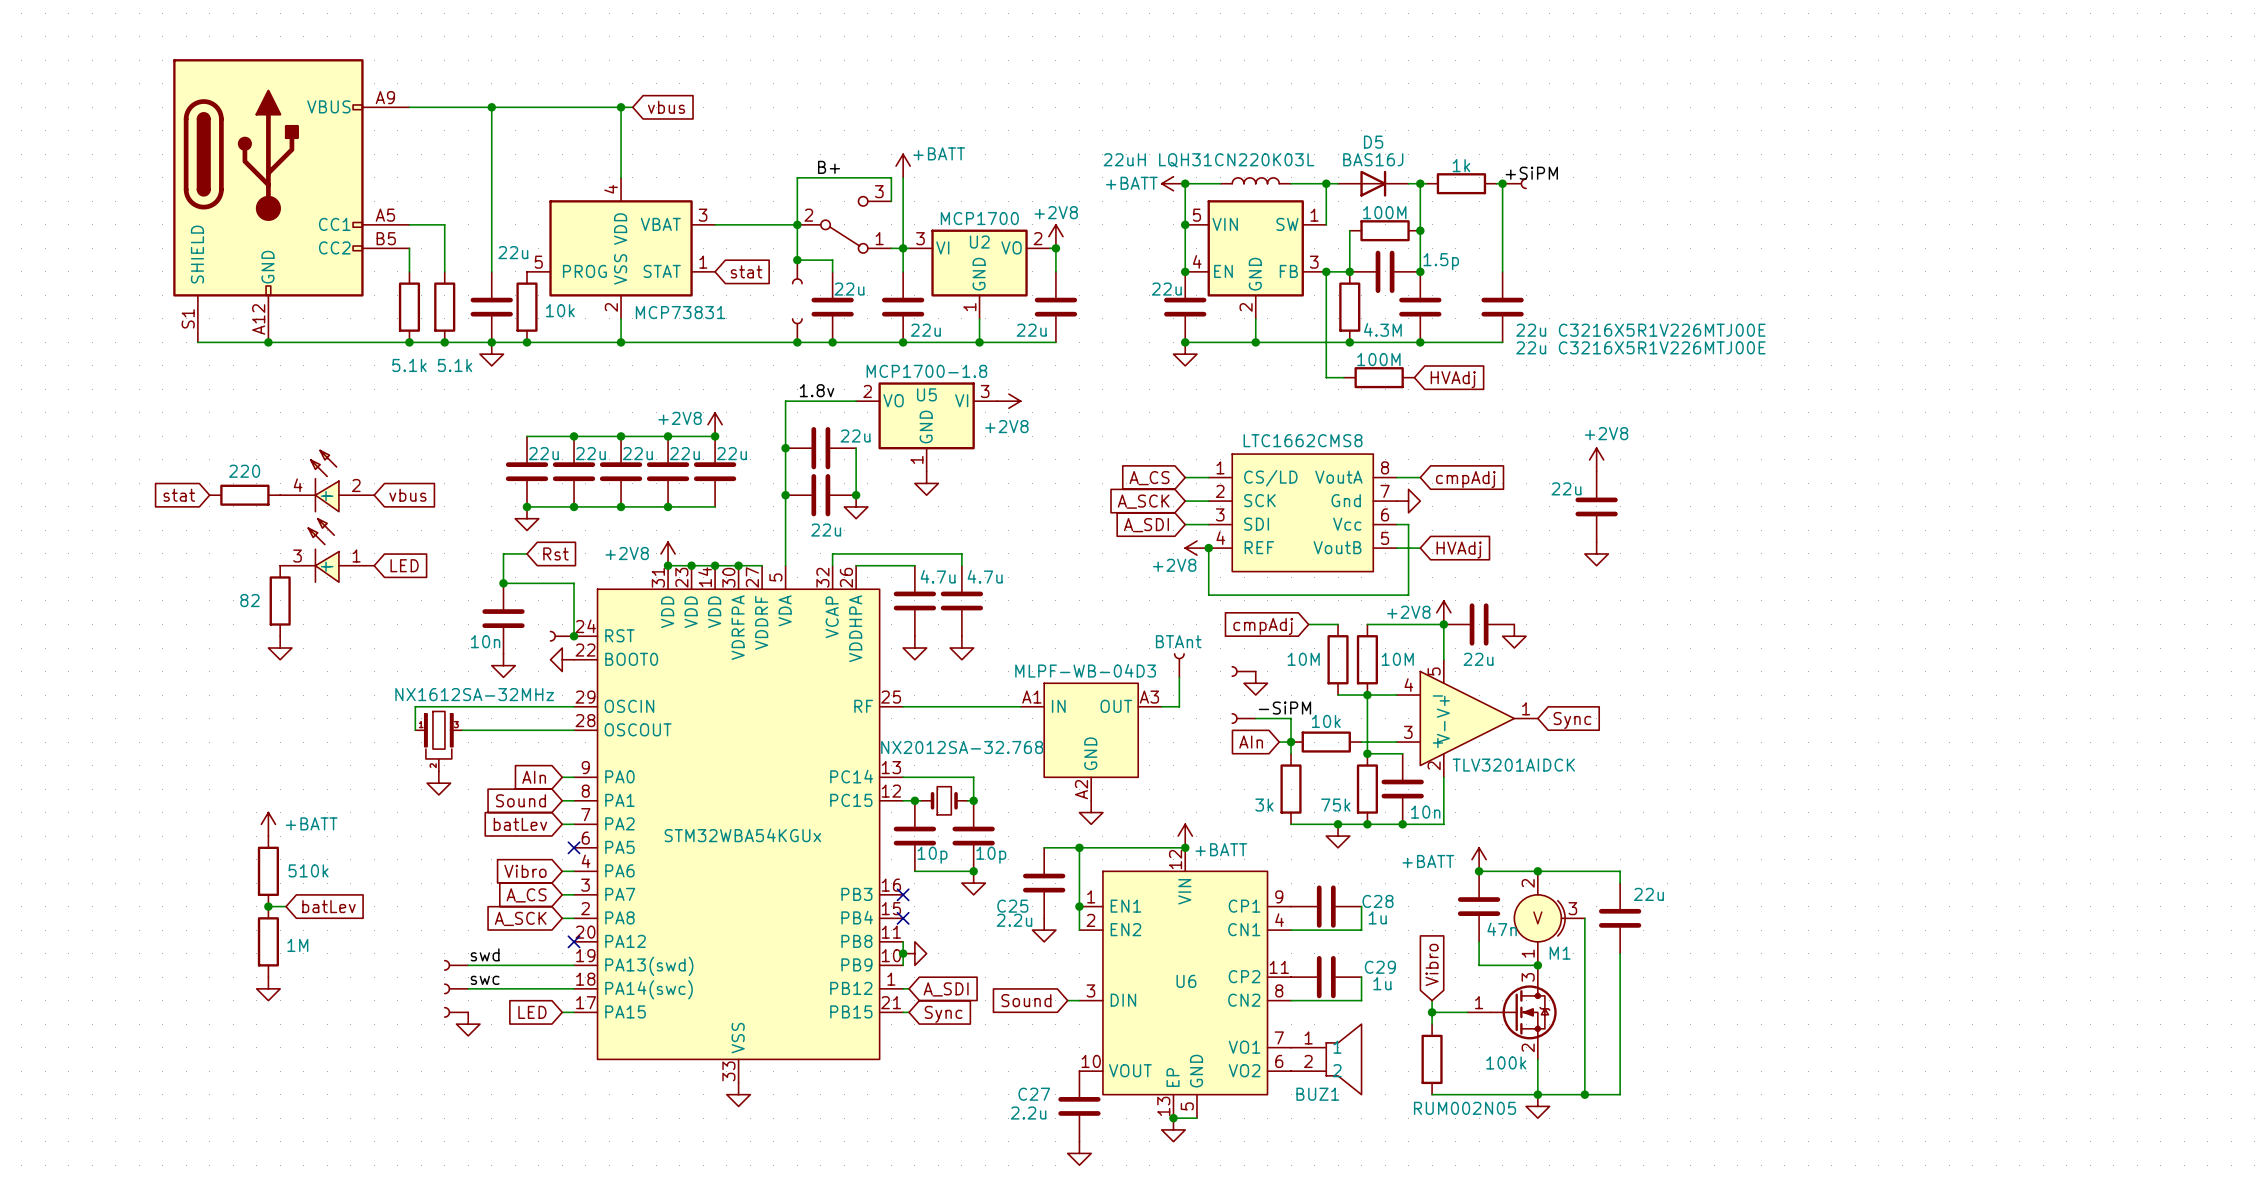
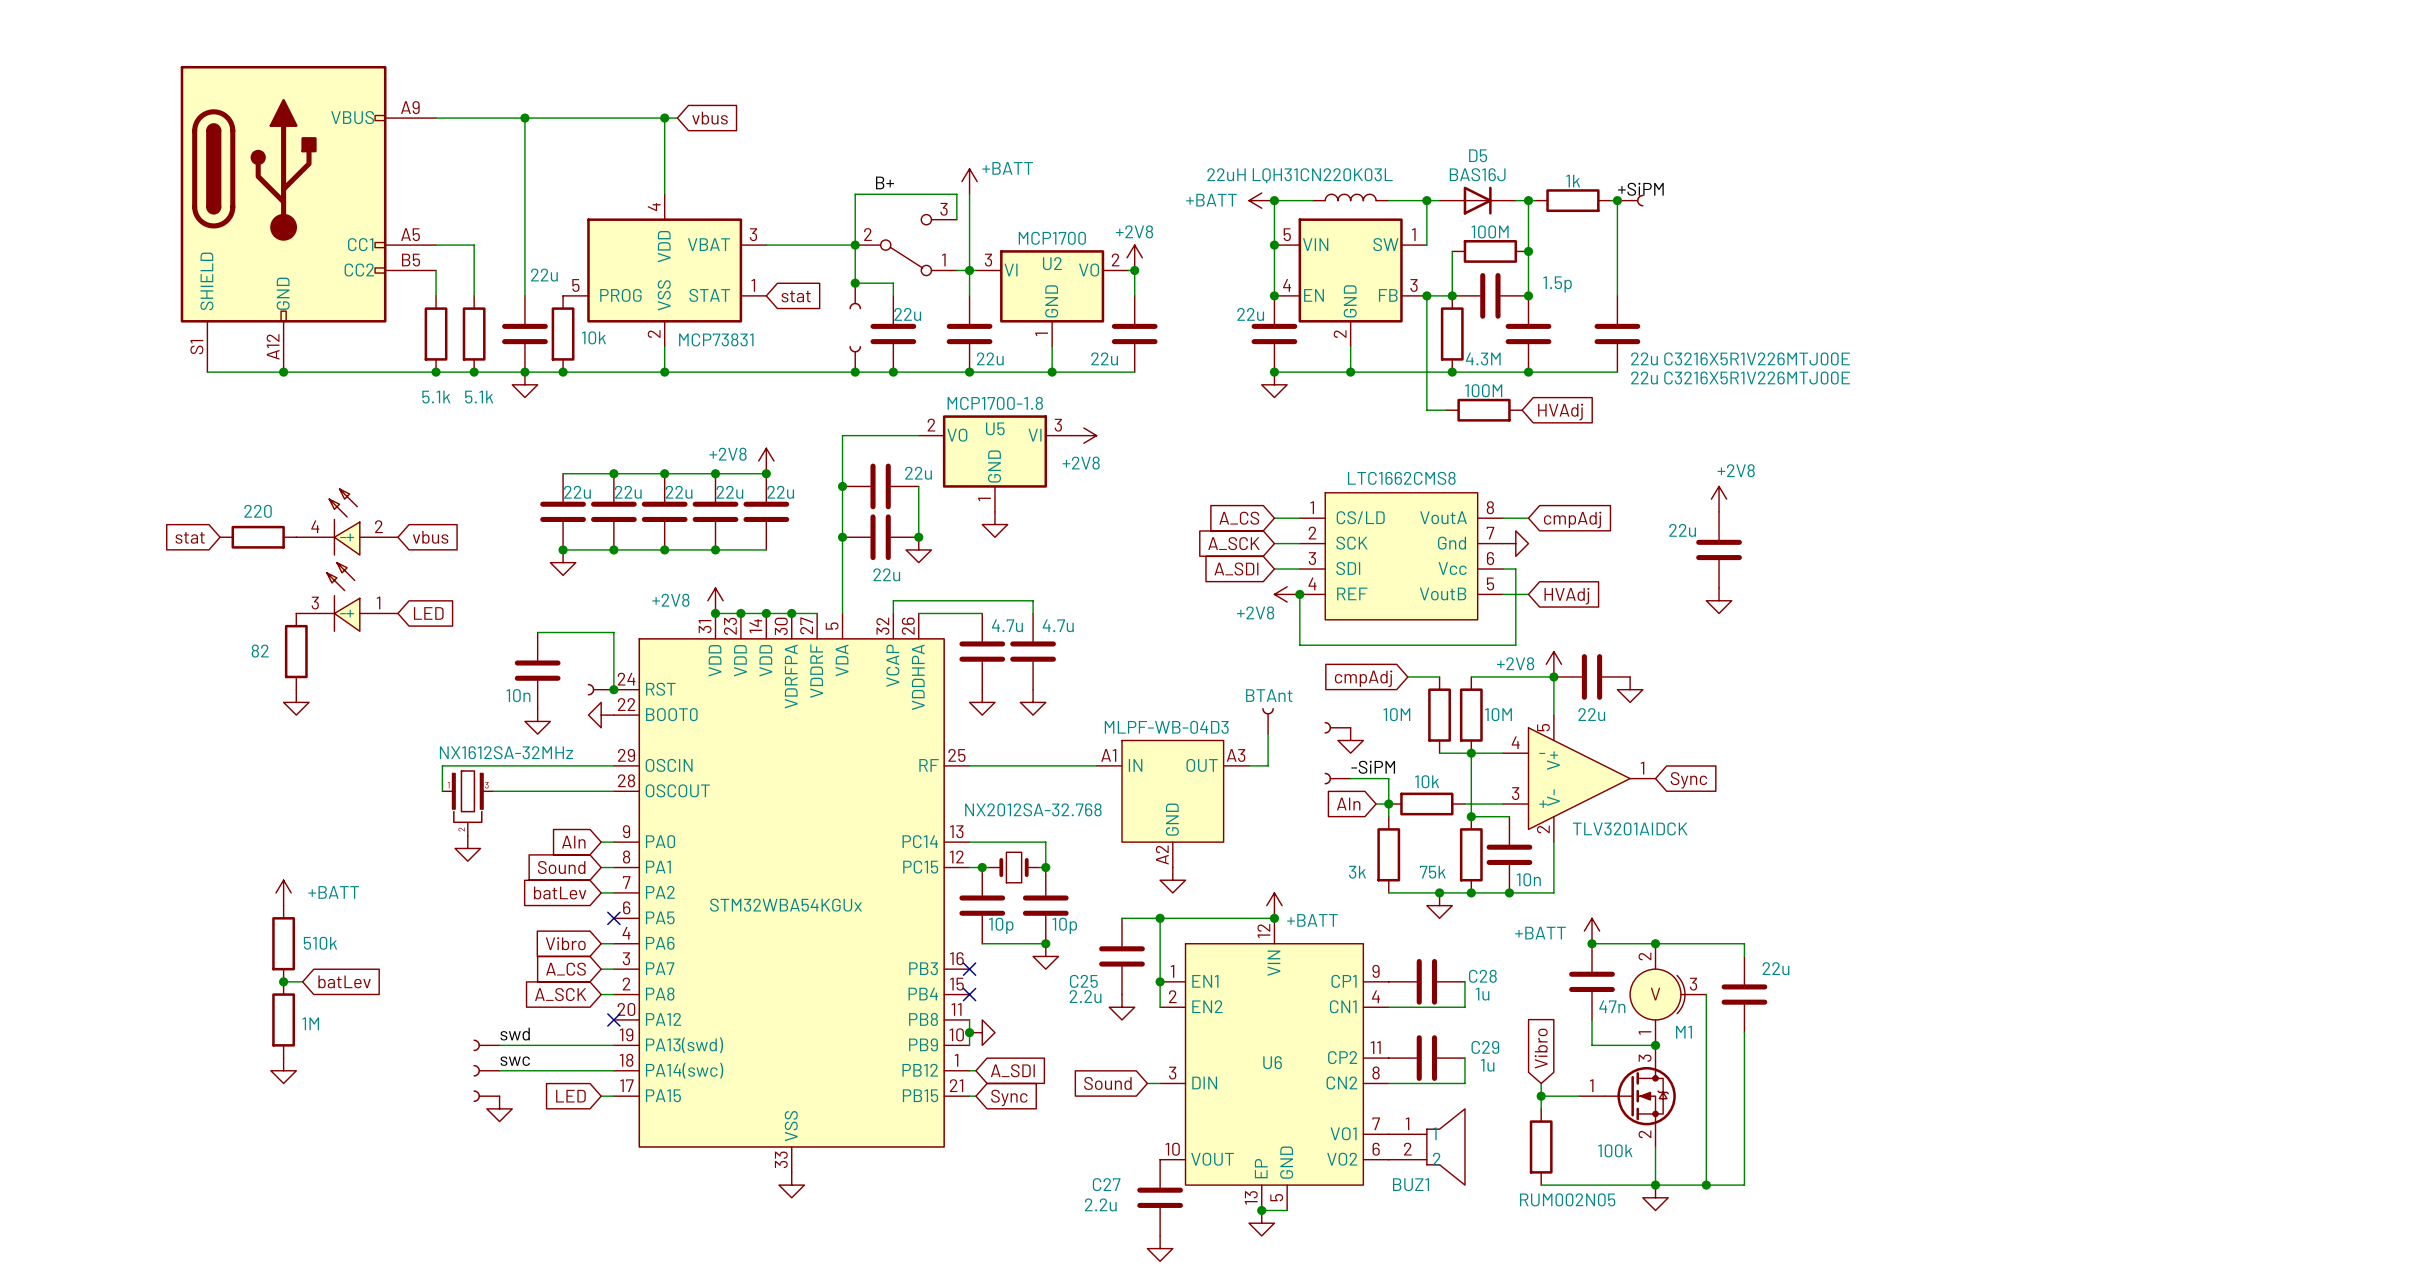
label: 1.8v (817, 390) -> none
wire: (527, 553) (503, 553) (503, 583) -> none
global label: Rst (555, 553) -> none
junction: (503, 583) -> none

